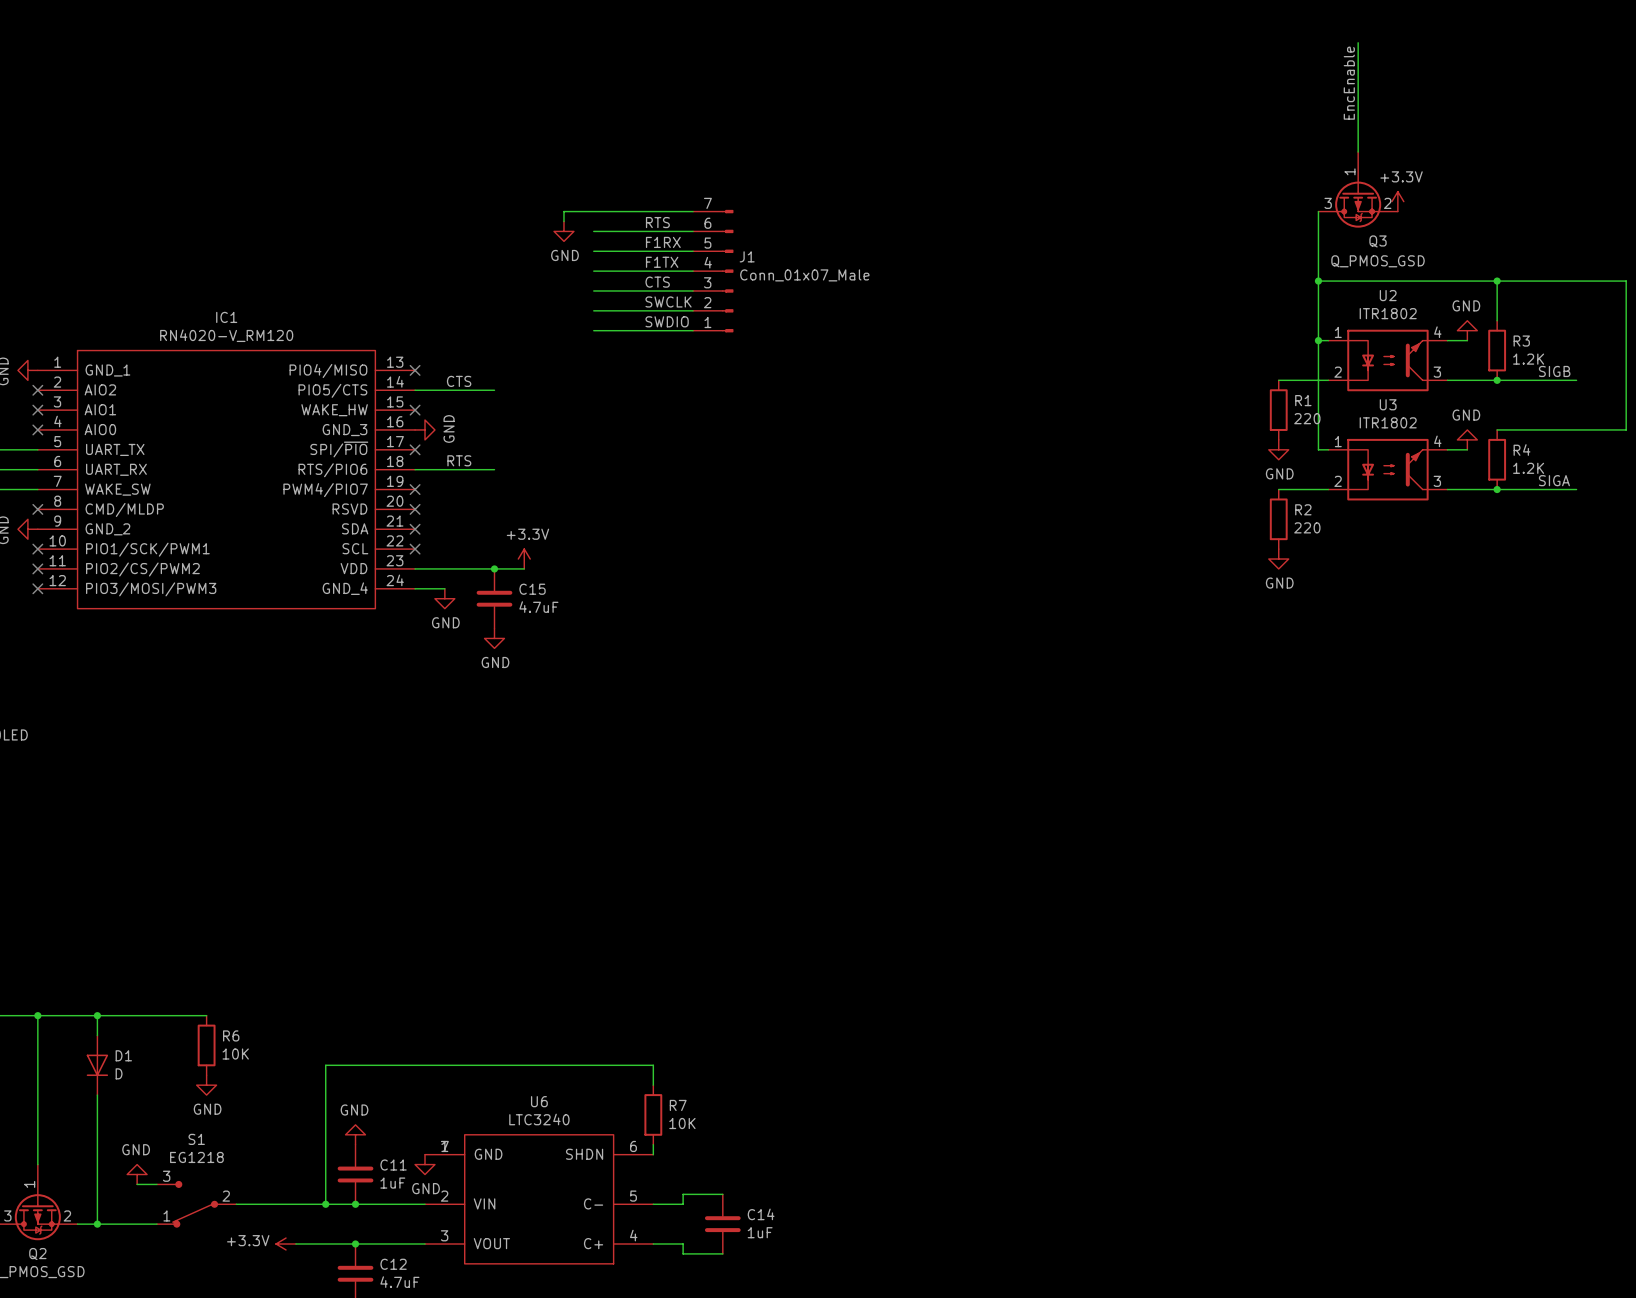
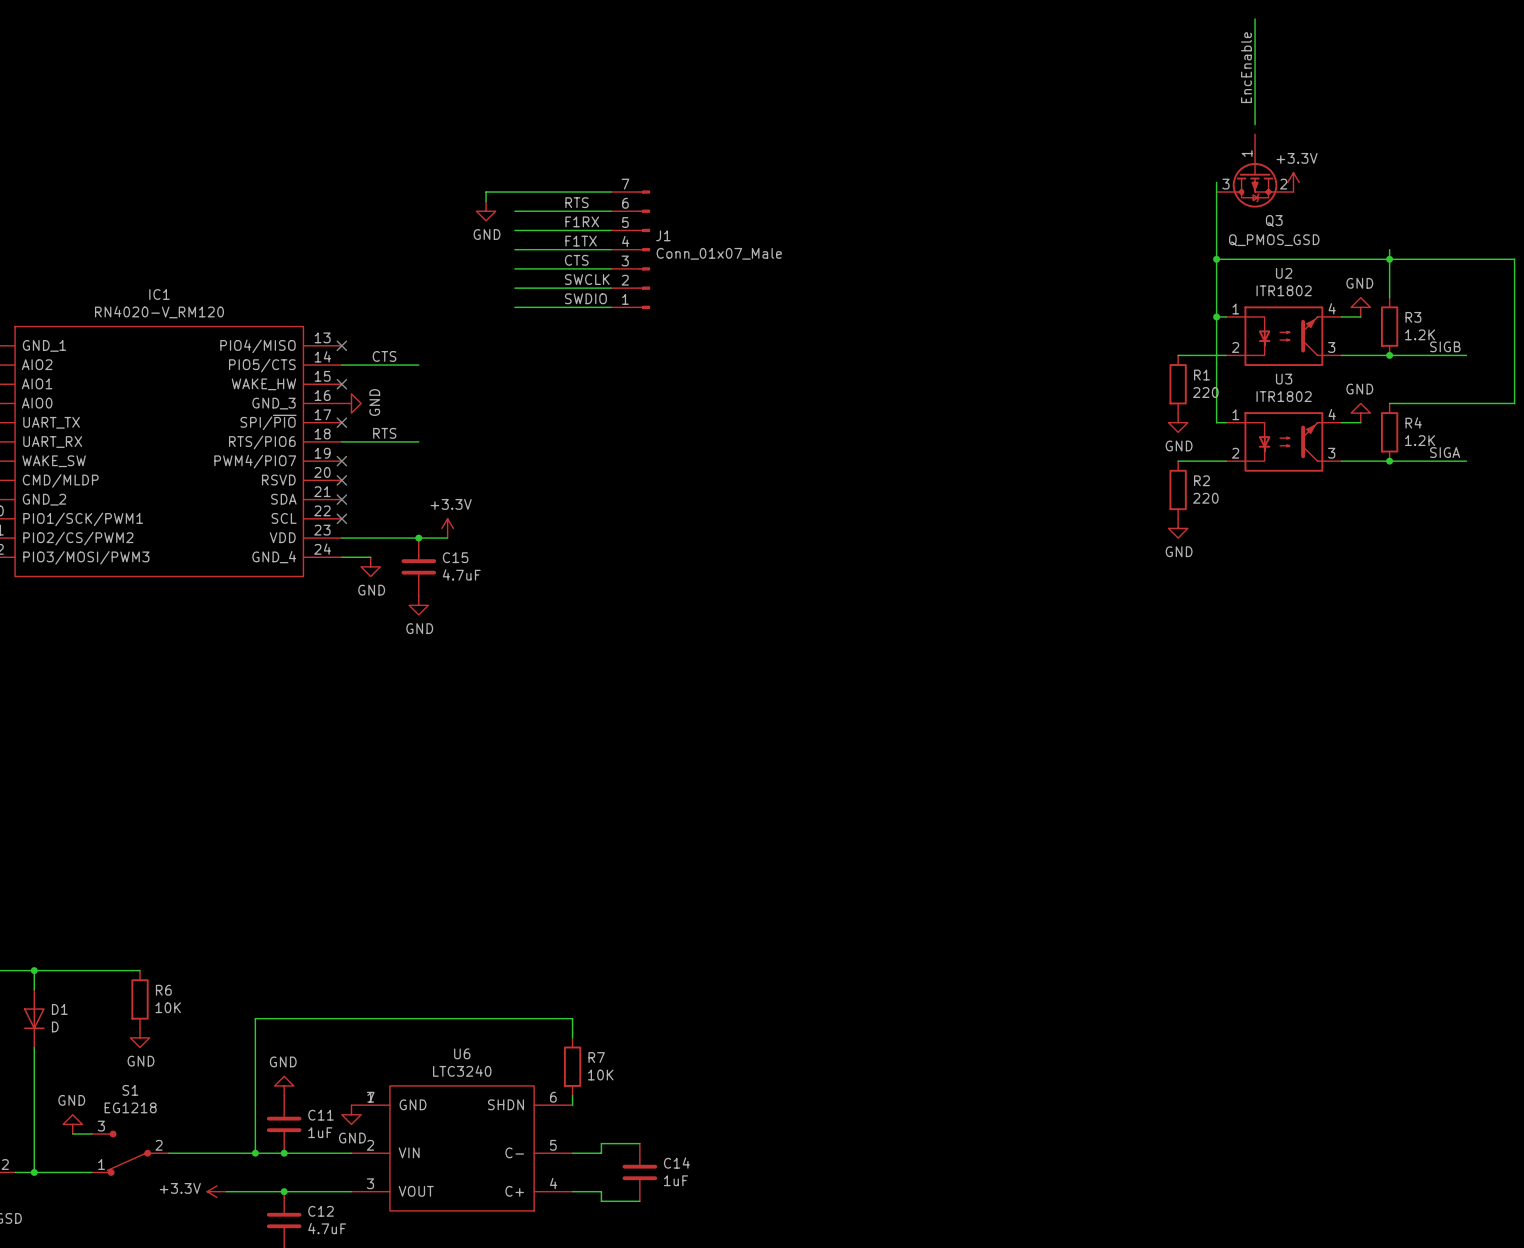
wire: none -> (1255, 18) (1255, 28)
wire: (1358, 142) (1358, 152) -> (1216, 182) (1216, 192)
wire: none -> (1389, 249) (1389, 259)

